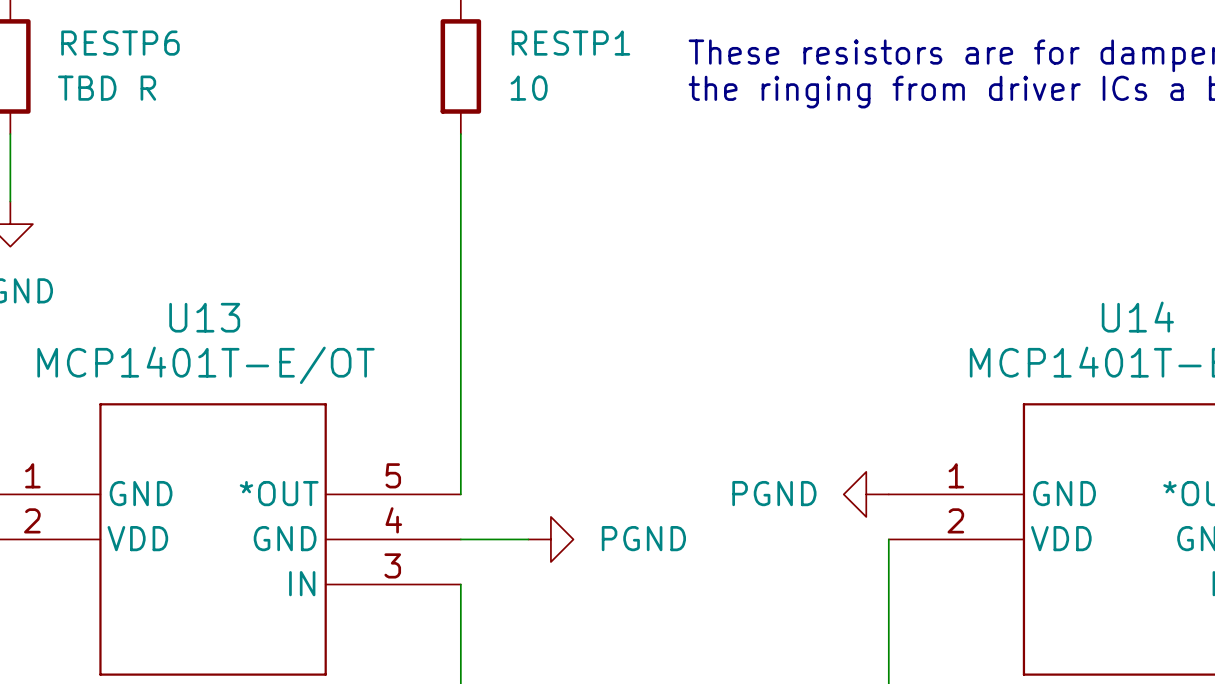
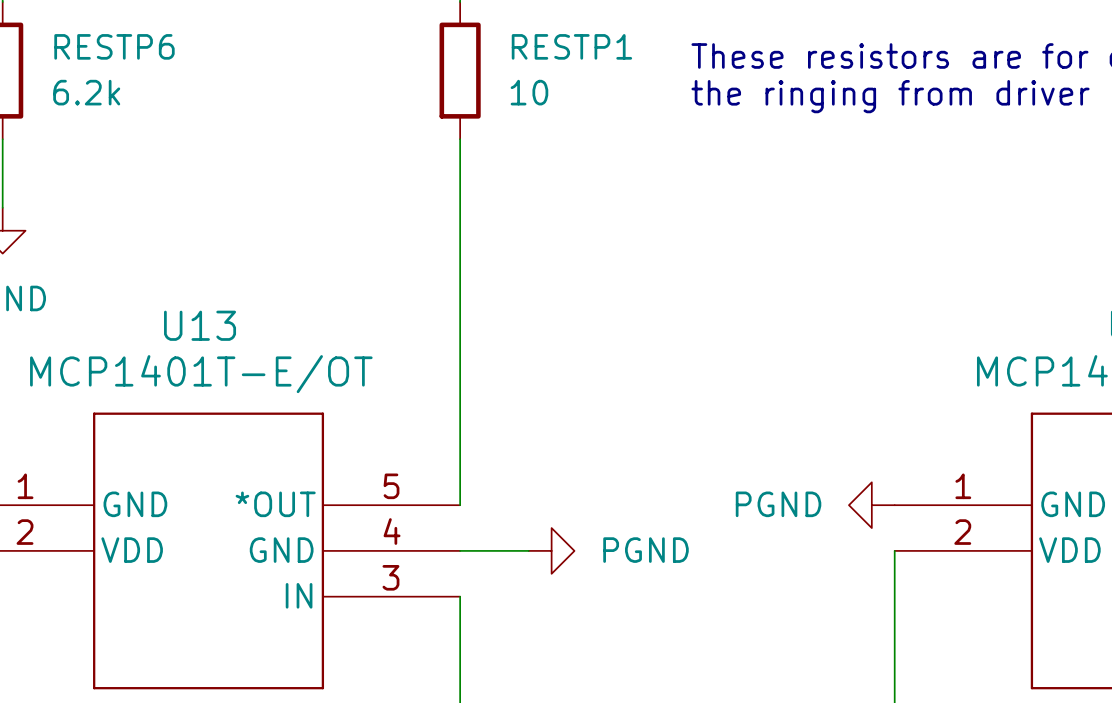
RESTP6 value: TBD R (107, 88) -> 6.2k (86, 92)

